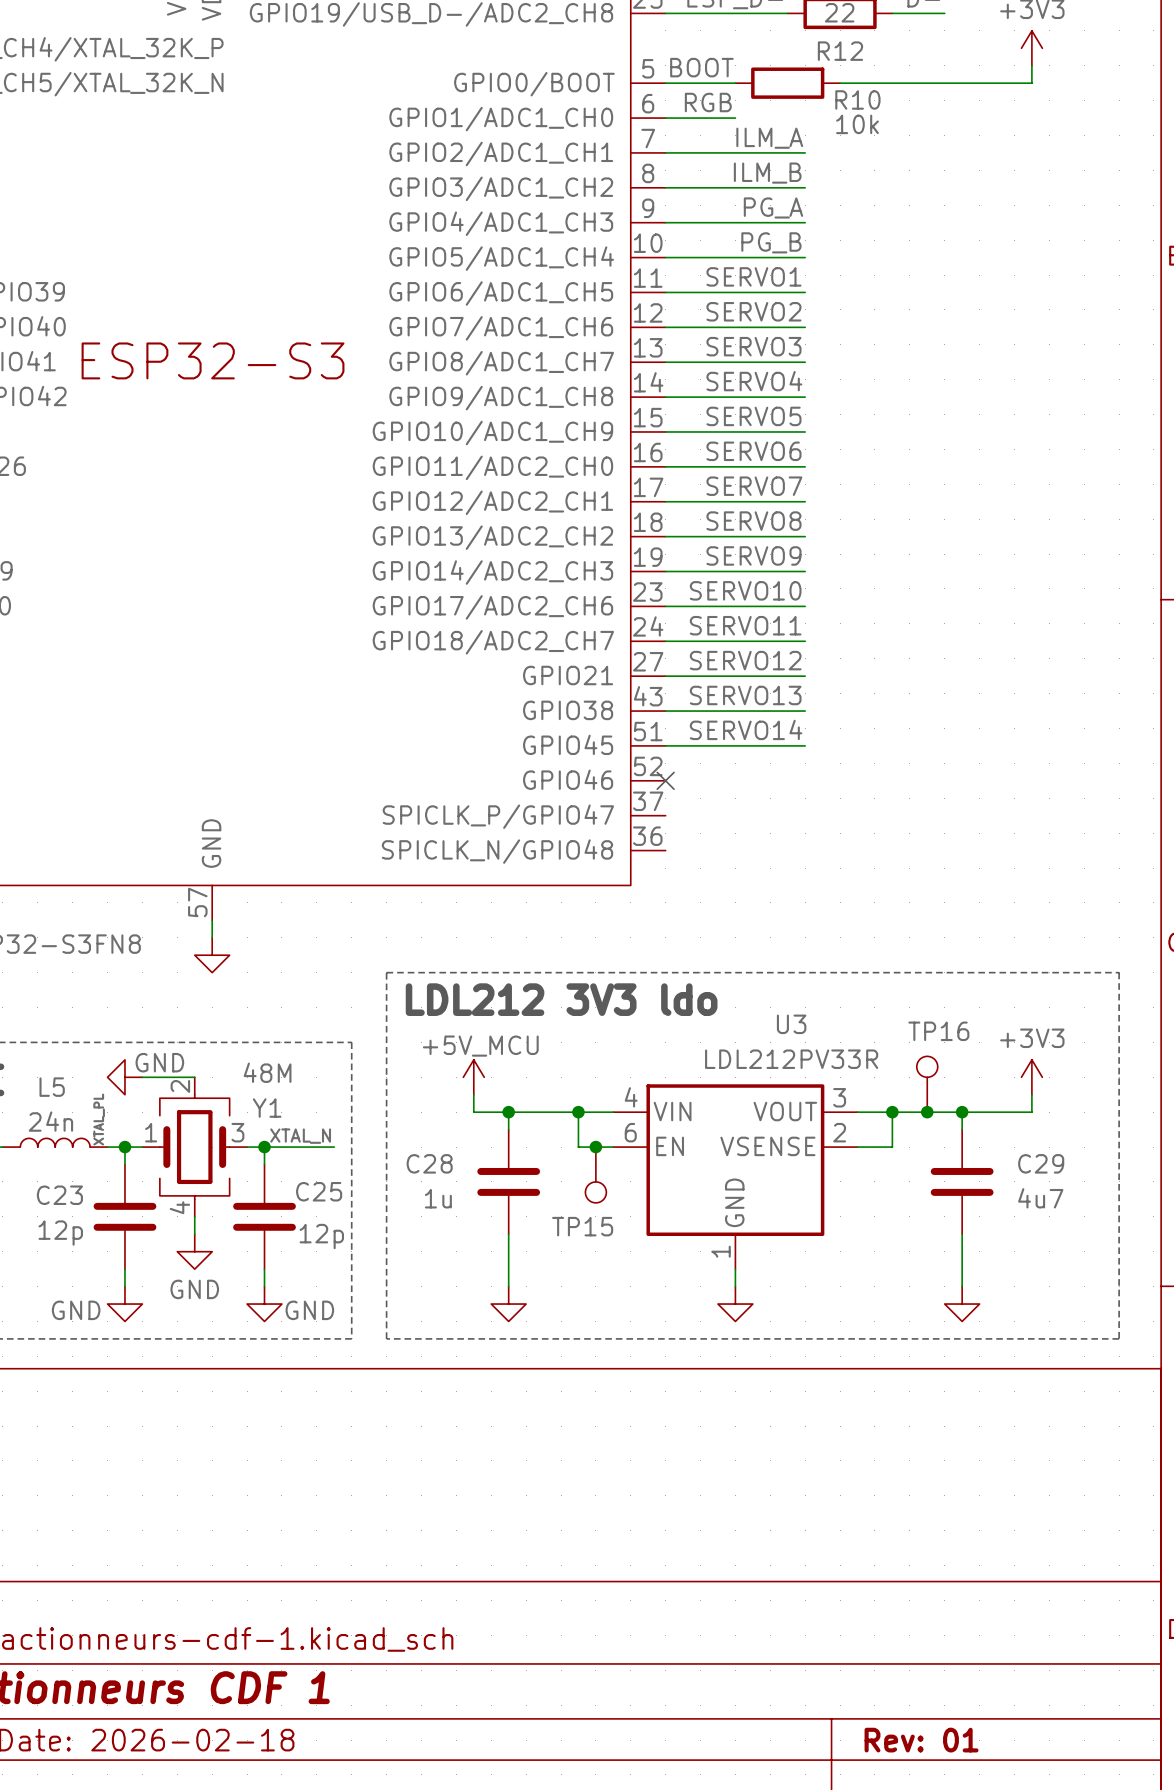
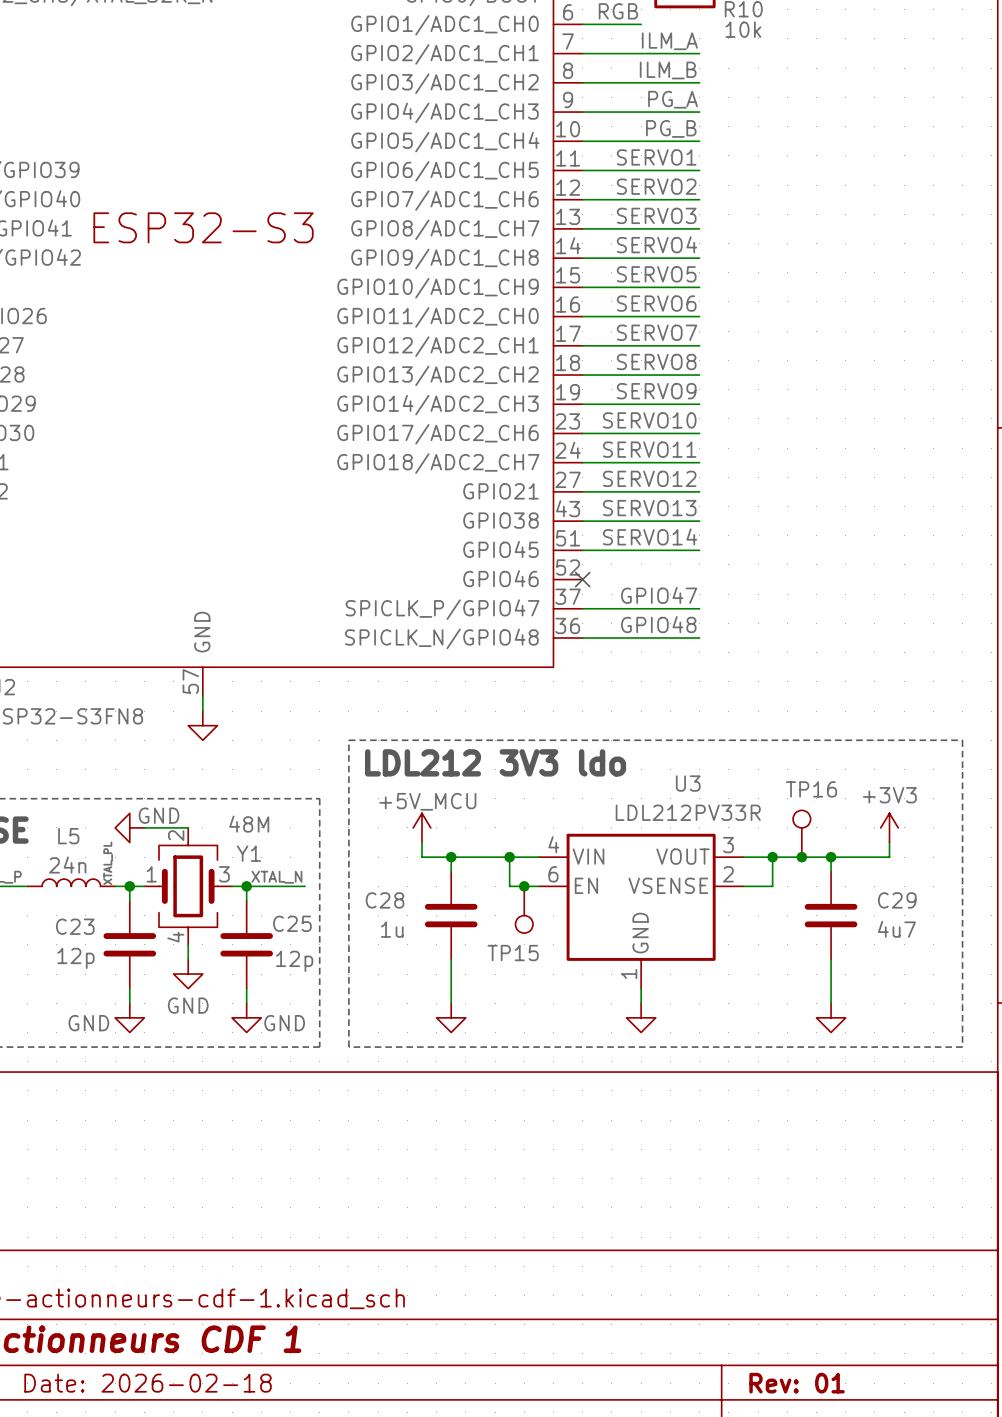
label: none -> GPIO47 (659, 595)
wire: none -> (582, 608) (699, 608)
label: none -> GPIO48 (658, 624)
wire: none -> (582, 638) (699, 638)

